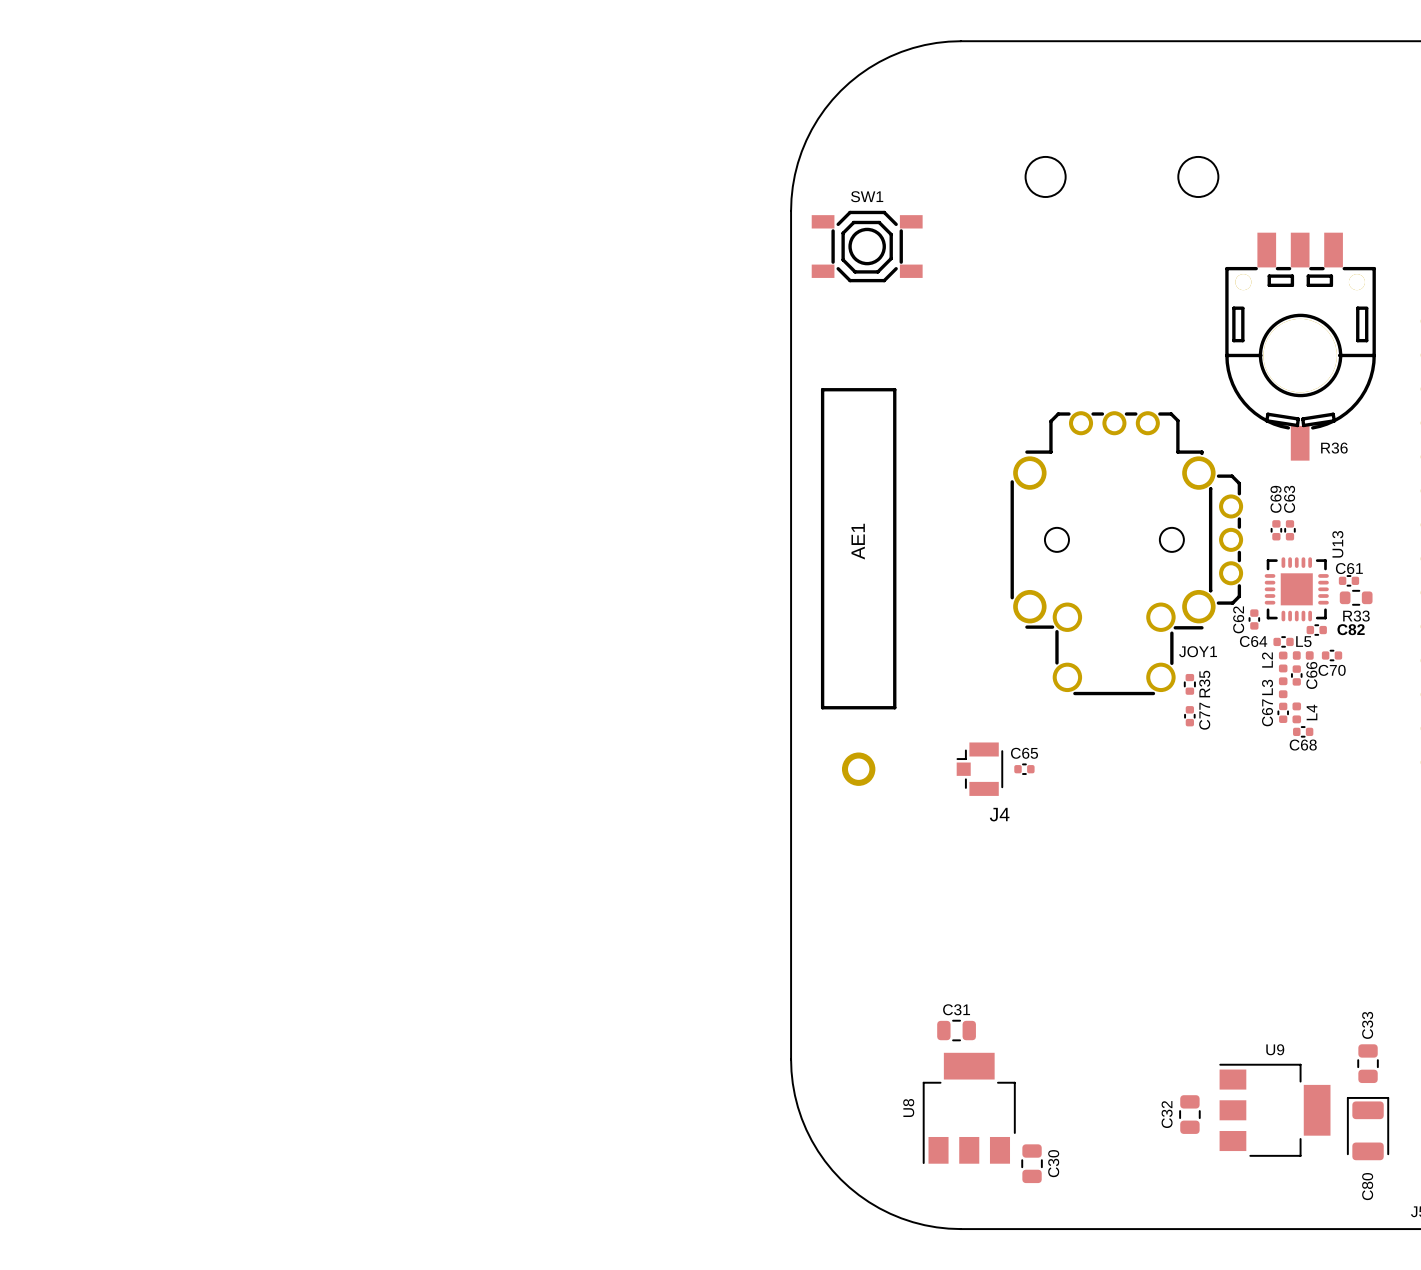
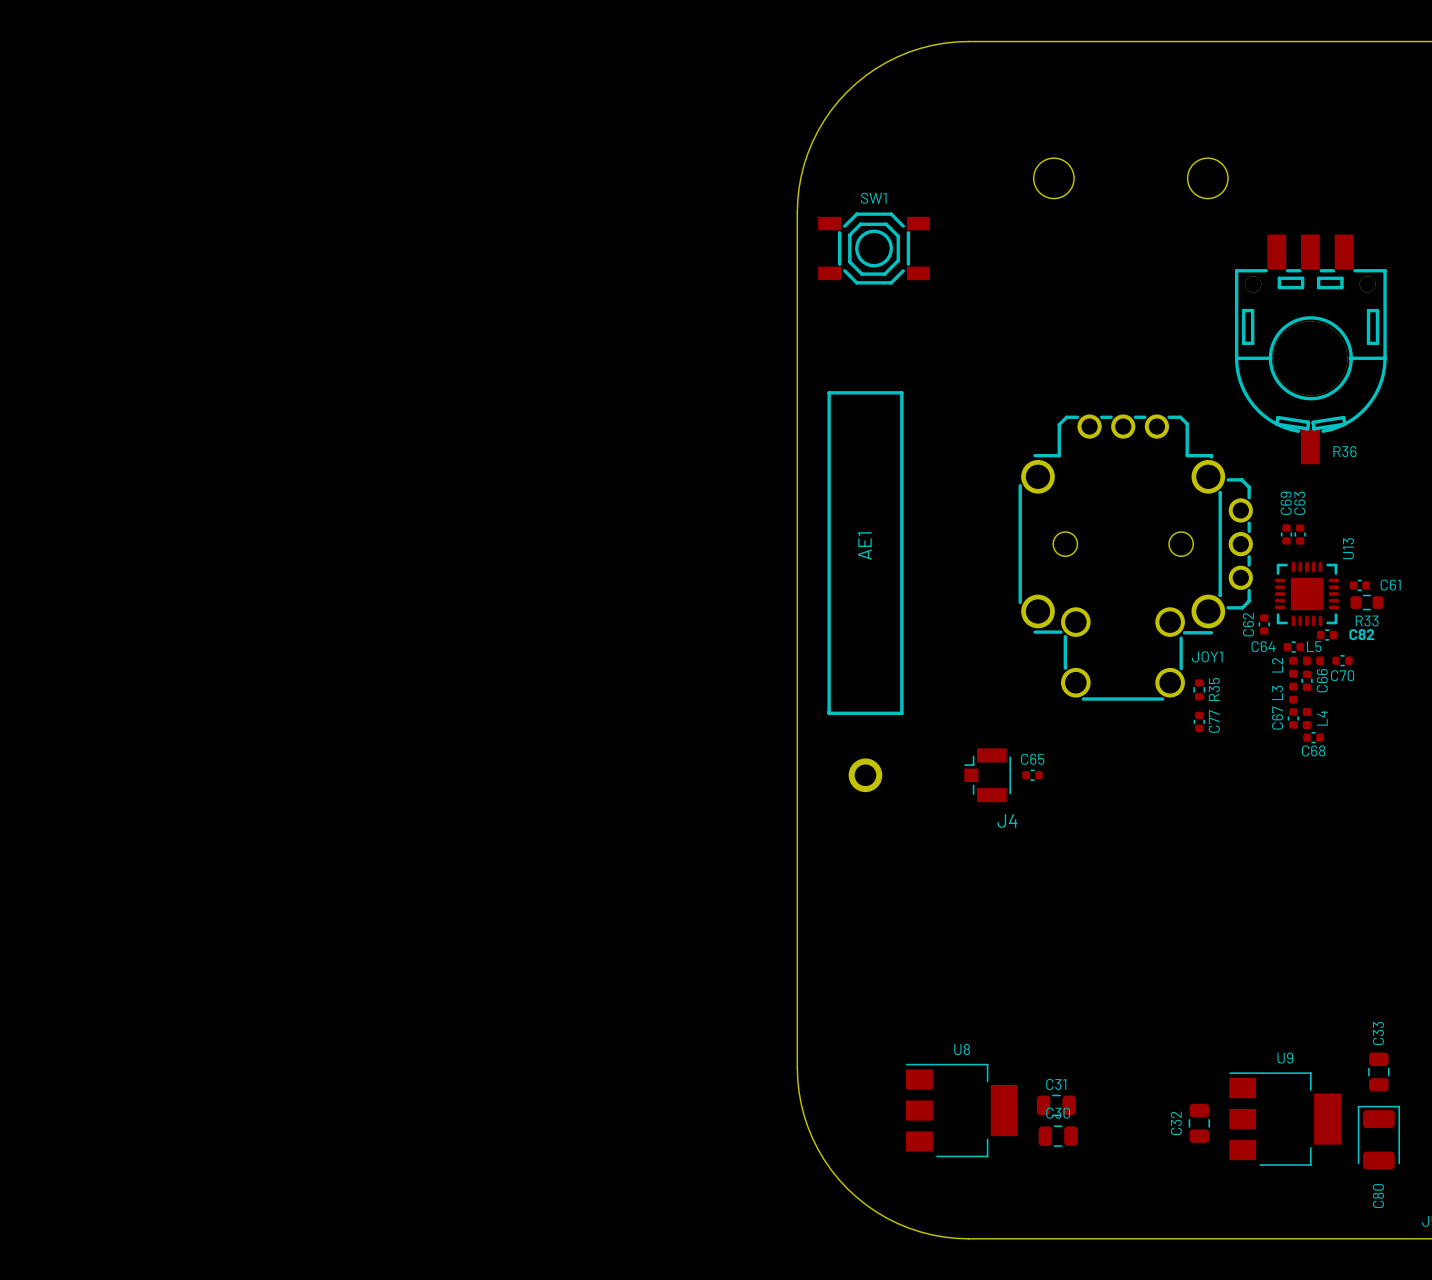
C61 name position: C61 (1349, 568) -> C61 (1390, 585)
C31 position: (956, 1030) -> (1056, 1105)
U8 rotation: 0° (969, 1108) -> 90° clockwise (961, 1110)
C30 rotation: 0° (1032, 1163) -> 90° clockwise (1058, 1136)
C30 position: (1032, 1163) -> (1058, 1136)
C30 name position: C30 (1053, 1163) -> C30 (1058, 1113)

